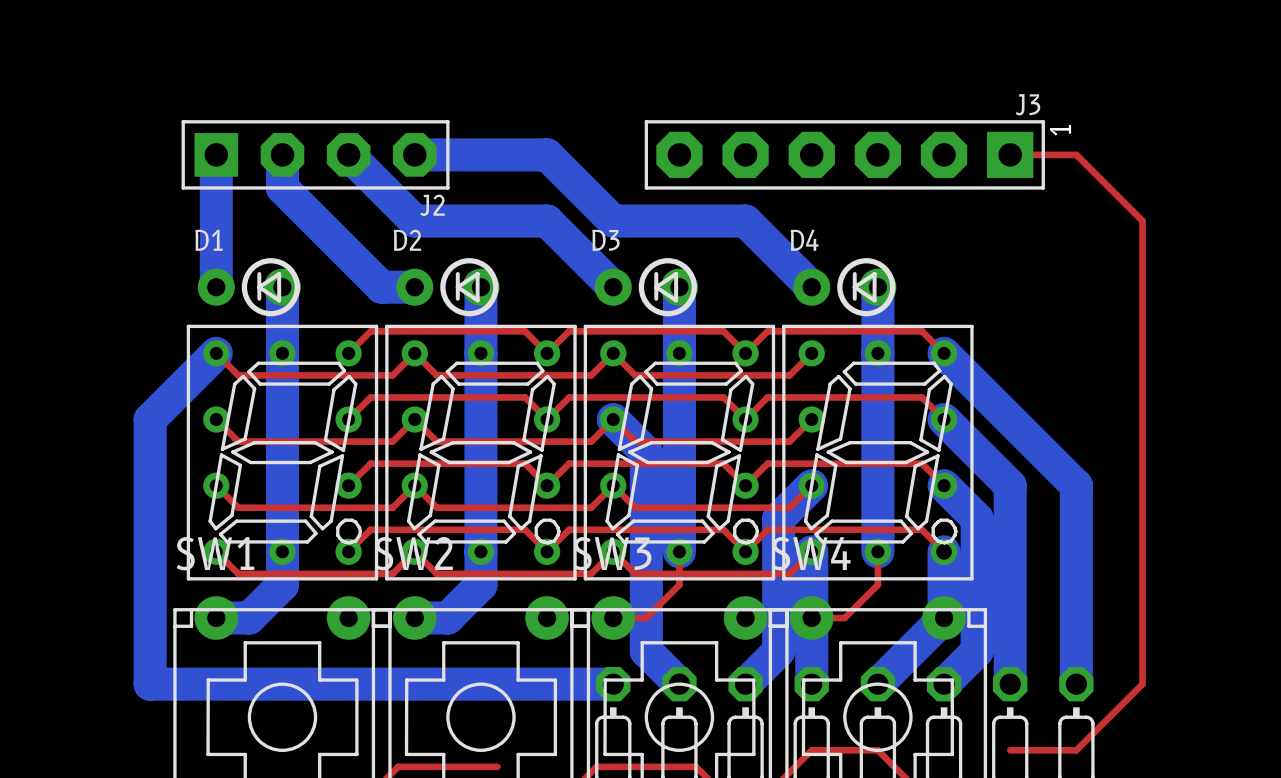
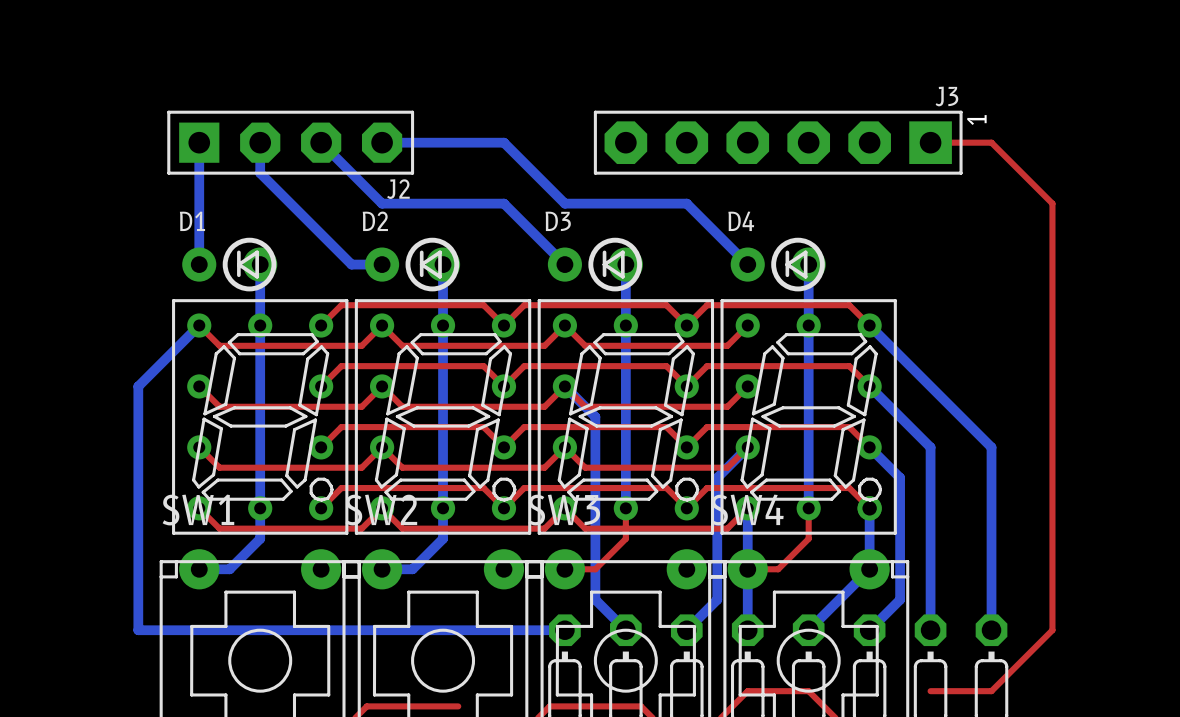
bottom track width: thick (216, 154) (216, 287) -> thin (199, 142) (199, 264)
bottom track width: thick (282, 154) (282, 187) (381, 287) (414, 287) -> thin (260, 142) (260, 173) (351, 264) (382, 264)
bottom track width: thick (348, 154) (414, 221) (547, 221) (613, 287) -> thin (321, 142) (382, 203) (503, 203) (564, 264)
bottom track width: thick (414, 154) (547, 154) (613, 221) (745, 221) (811, 287) -> thin (382, 142) (503, 142) (564, 203) (686, 203) (747, 264)
bottom track width: thick (282, 287) (282, 584) (249, 618) (216, 618) -> thin (260, 264) (260, 538) (229, 569) (199, 569)
bottom track width: thick (480, 287) (480, 584) (447, 618) (414, 618) -> thin (443, 264) (443, 538) (412, 569) (382, 569)
bottom track width: thick (679, 287) (679, 551) -> thin (625, 264) (625, 508)
bottom track width: thick (877, 287) (877, 551) -> thin (808, 264) (808, 508)
bottom track width: thick (216, 353) (150, 419) (150, 684) (613, 684) -> thin (199, 325) (138, 386) (138, 630) (564, 630)
bottom track width: thick (944, 353) (1076, 485) (1076, 684) -> thin (869, 325) (991, 447) (991, 630)
bottom track width: thick (613, 419) (646, 452) (646, 651) (679, 684) -> thin (564, 386) (595, 416) (595, 599) (625, 630)
bottom track width: thick (944, 419) (1010, 485) (1010, 684) -> thin (869, 386) (930, 447) (930, 630)
bottom track width: thick (811, 485) (778, 518) (778, 651) (745, 684) -> thin (747, 447) (717, 477) (717, 599) (686, 630)
bottom track width: thick (944, 485) (977, 518) (977, 651) (944, 684) -> thin (869, 447) (900, 477) (900, 599) (869, 630)
bottom track width: thick (811, 551) (811, 684) -> thin (747, 508) (747, 630)
bottom track width: thick (944, 551) (944, 618) (877, 684) -> thin (869, 508) (869, 569) (808, 630)

